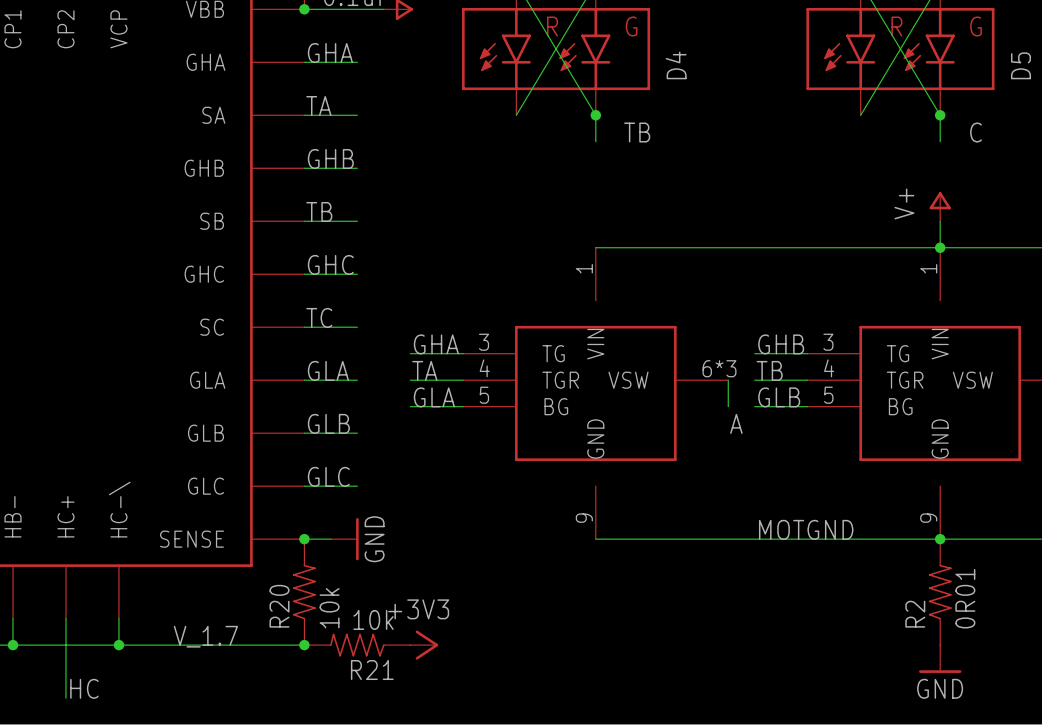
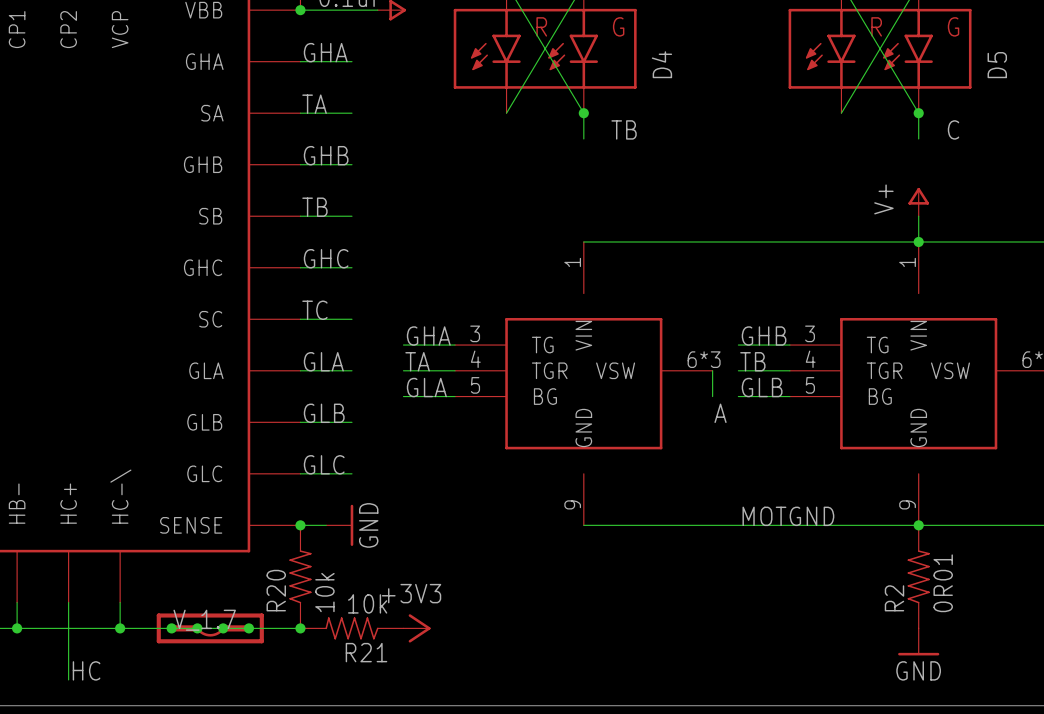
junction: none -> (171, 628)
junction: none -> (197, 628)
part: none -> (210, 628)
junction: none -> (223, 628)
junction: none -> (248, 628)

